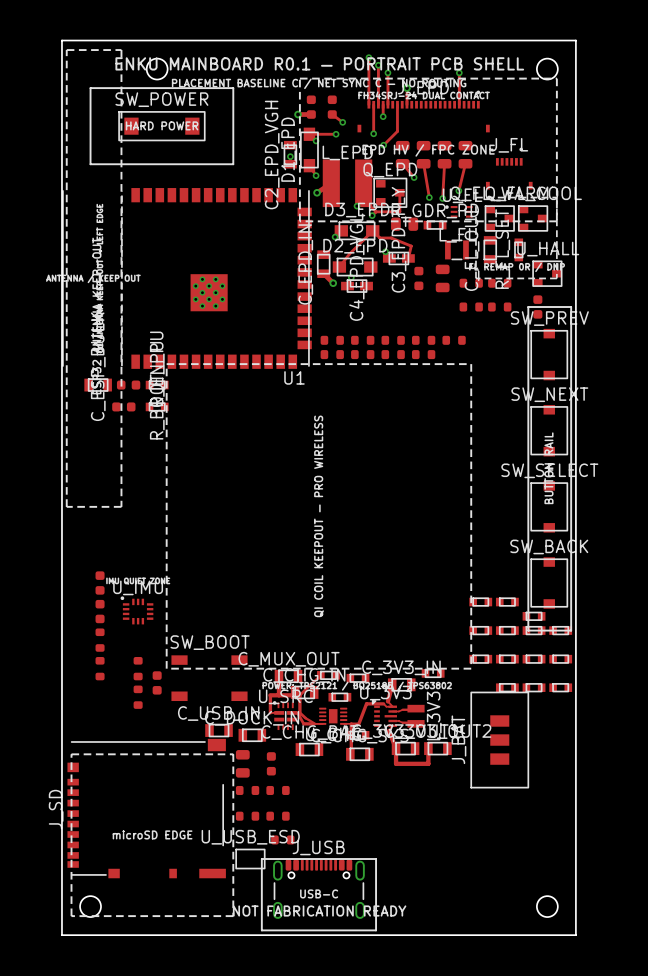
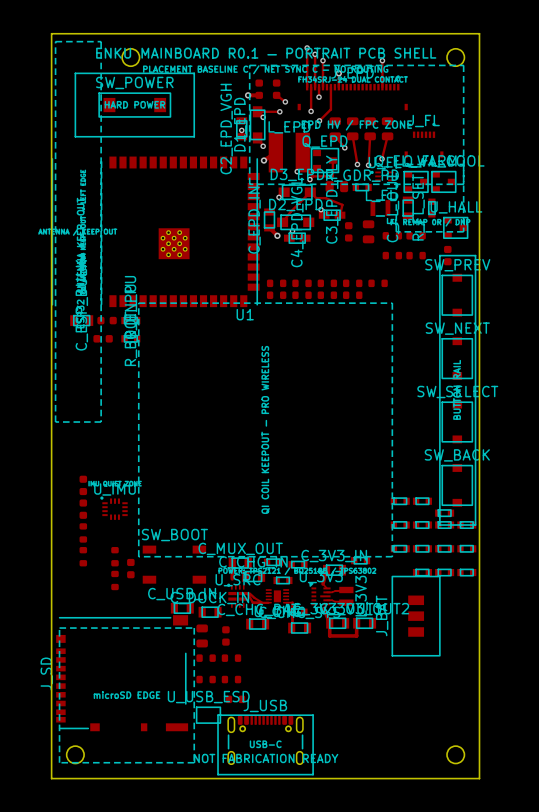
track: (320, 675) (299, 695) -> none
track: (299, 695) (270, 695) (270, 712) (279, 712) -> none
track: (299, 695) (299, 712) -> none
track: (392, 706) (386, 706) (383, 703) (366, 703) (358, 723) (351, 723) -> none

